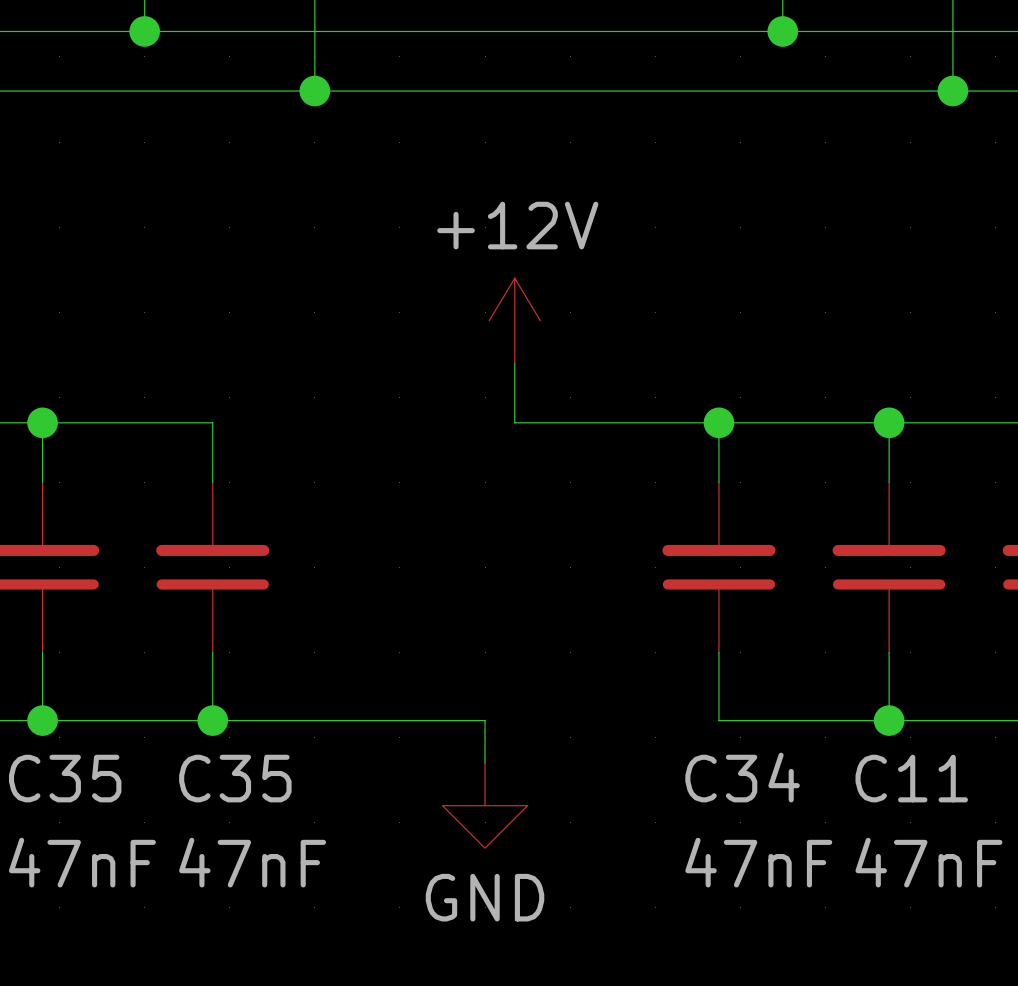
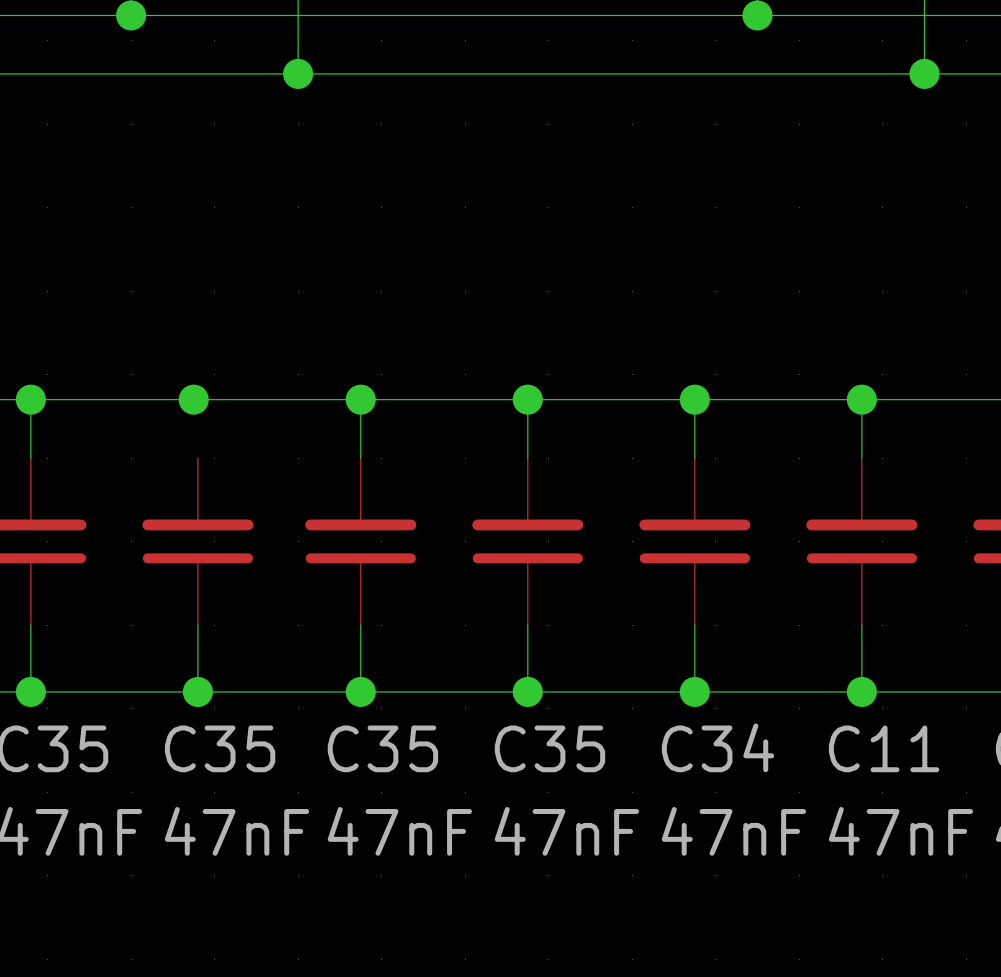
power symbol: +12V (514, 320) -> none
wire: (514, 363) (514, 422) -> (527, 399) (527, 458)
junction: none -> (193, 399)
wire: (212, 422) (212, 482) -> (197, 399) (494, 399)
wire: none -> (360, 399) (360, 458)
junction: none -> (360, 399)
junction: none -> (527, 399)
C35: none -> 47nF (360, 541)
C35: none -> 47nF (527, 541)
wire: none -> (360, 625) (360, 691)
wire: none -> (527, 625) (527, 691)
junction: none -> (360, 691)
wire: (485, 720) (485, 763) -> (465, 691) (694, 691)
junction: none -> (527, 691)
junction: none -> (694, 691)
power symbol: GND (485, 805) -> none

